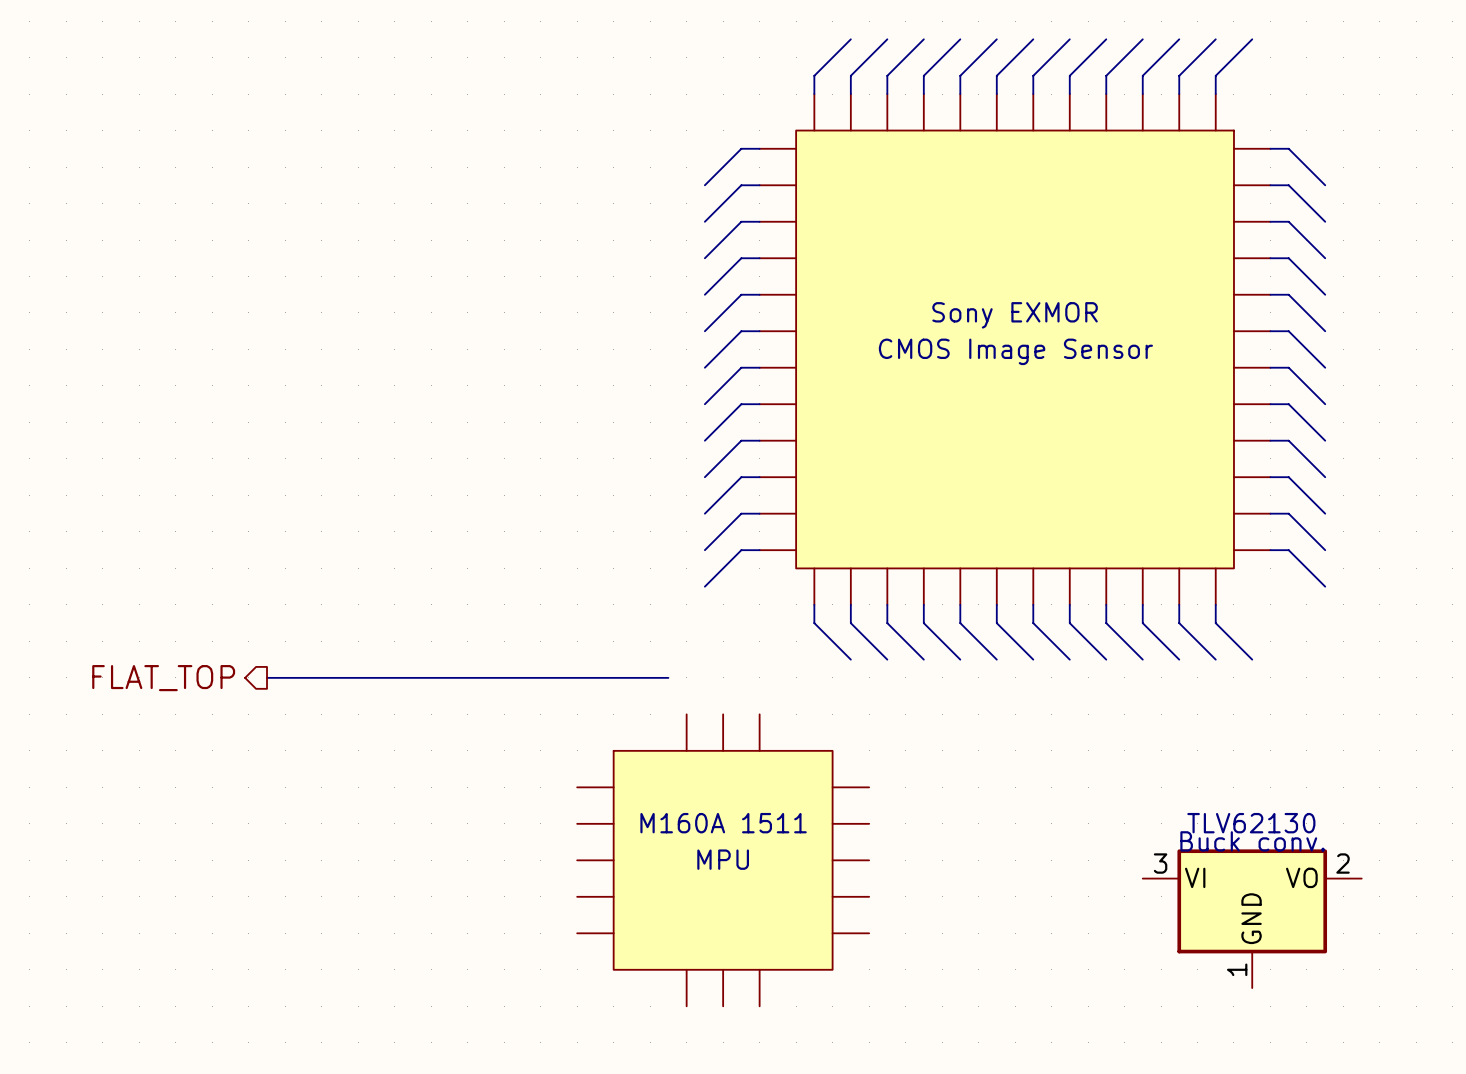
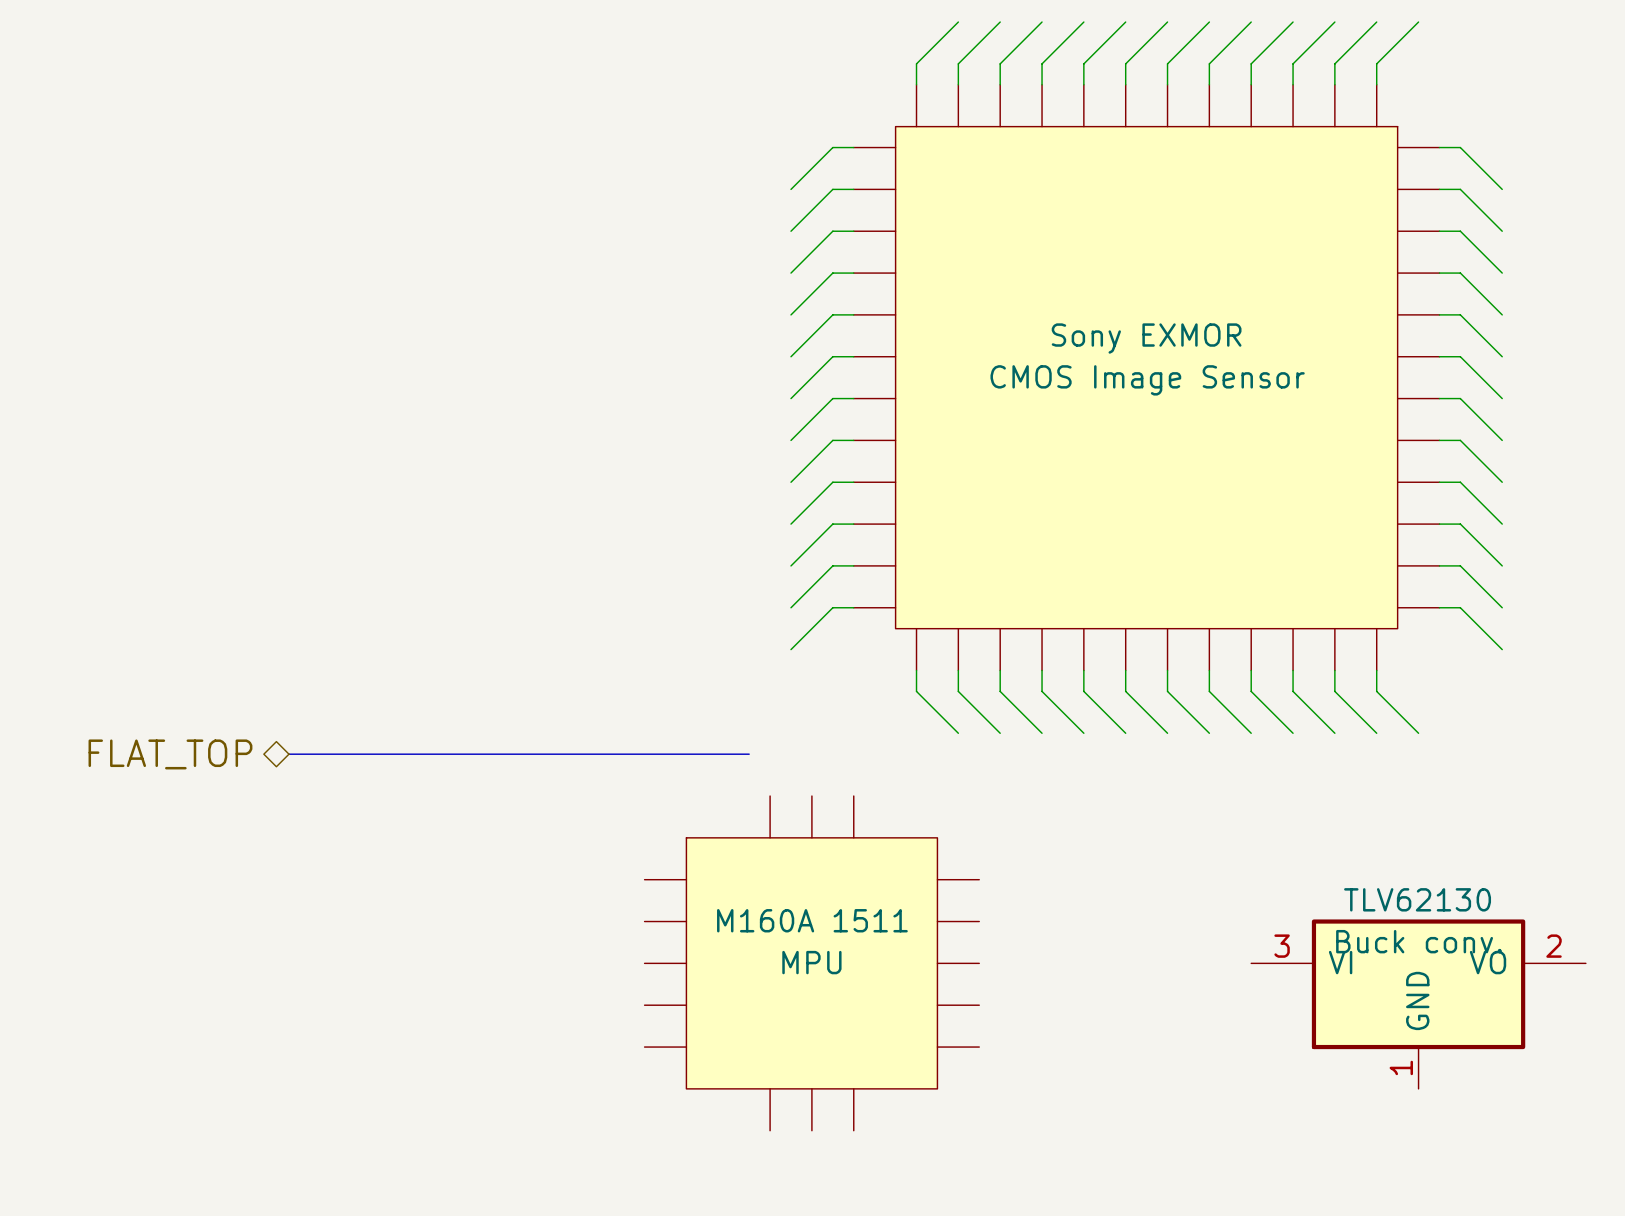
hierarchical label shape: output (163, 678) -> bidirectional (170, 754)
part: none -> TLV62130 (1418, 1004)
part: TLV62130 (1252, 918) -> none

